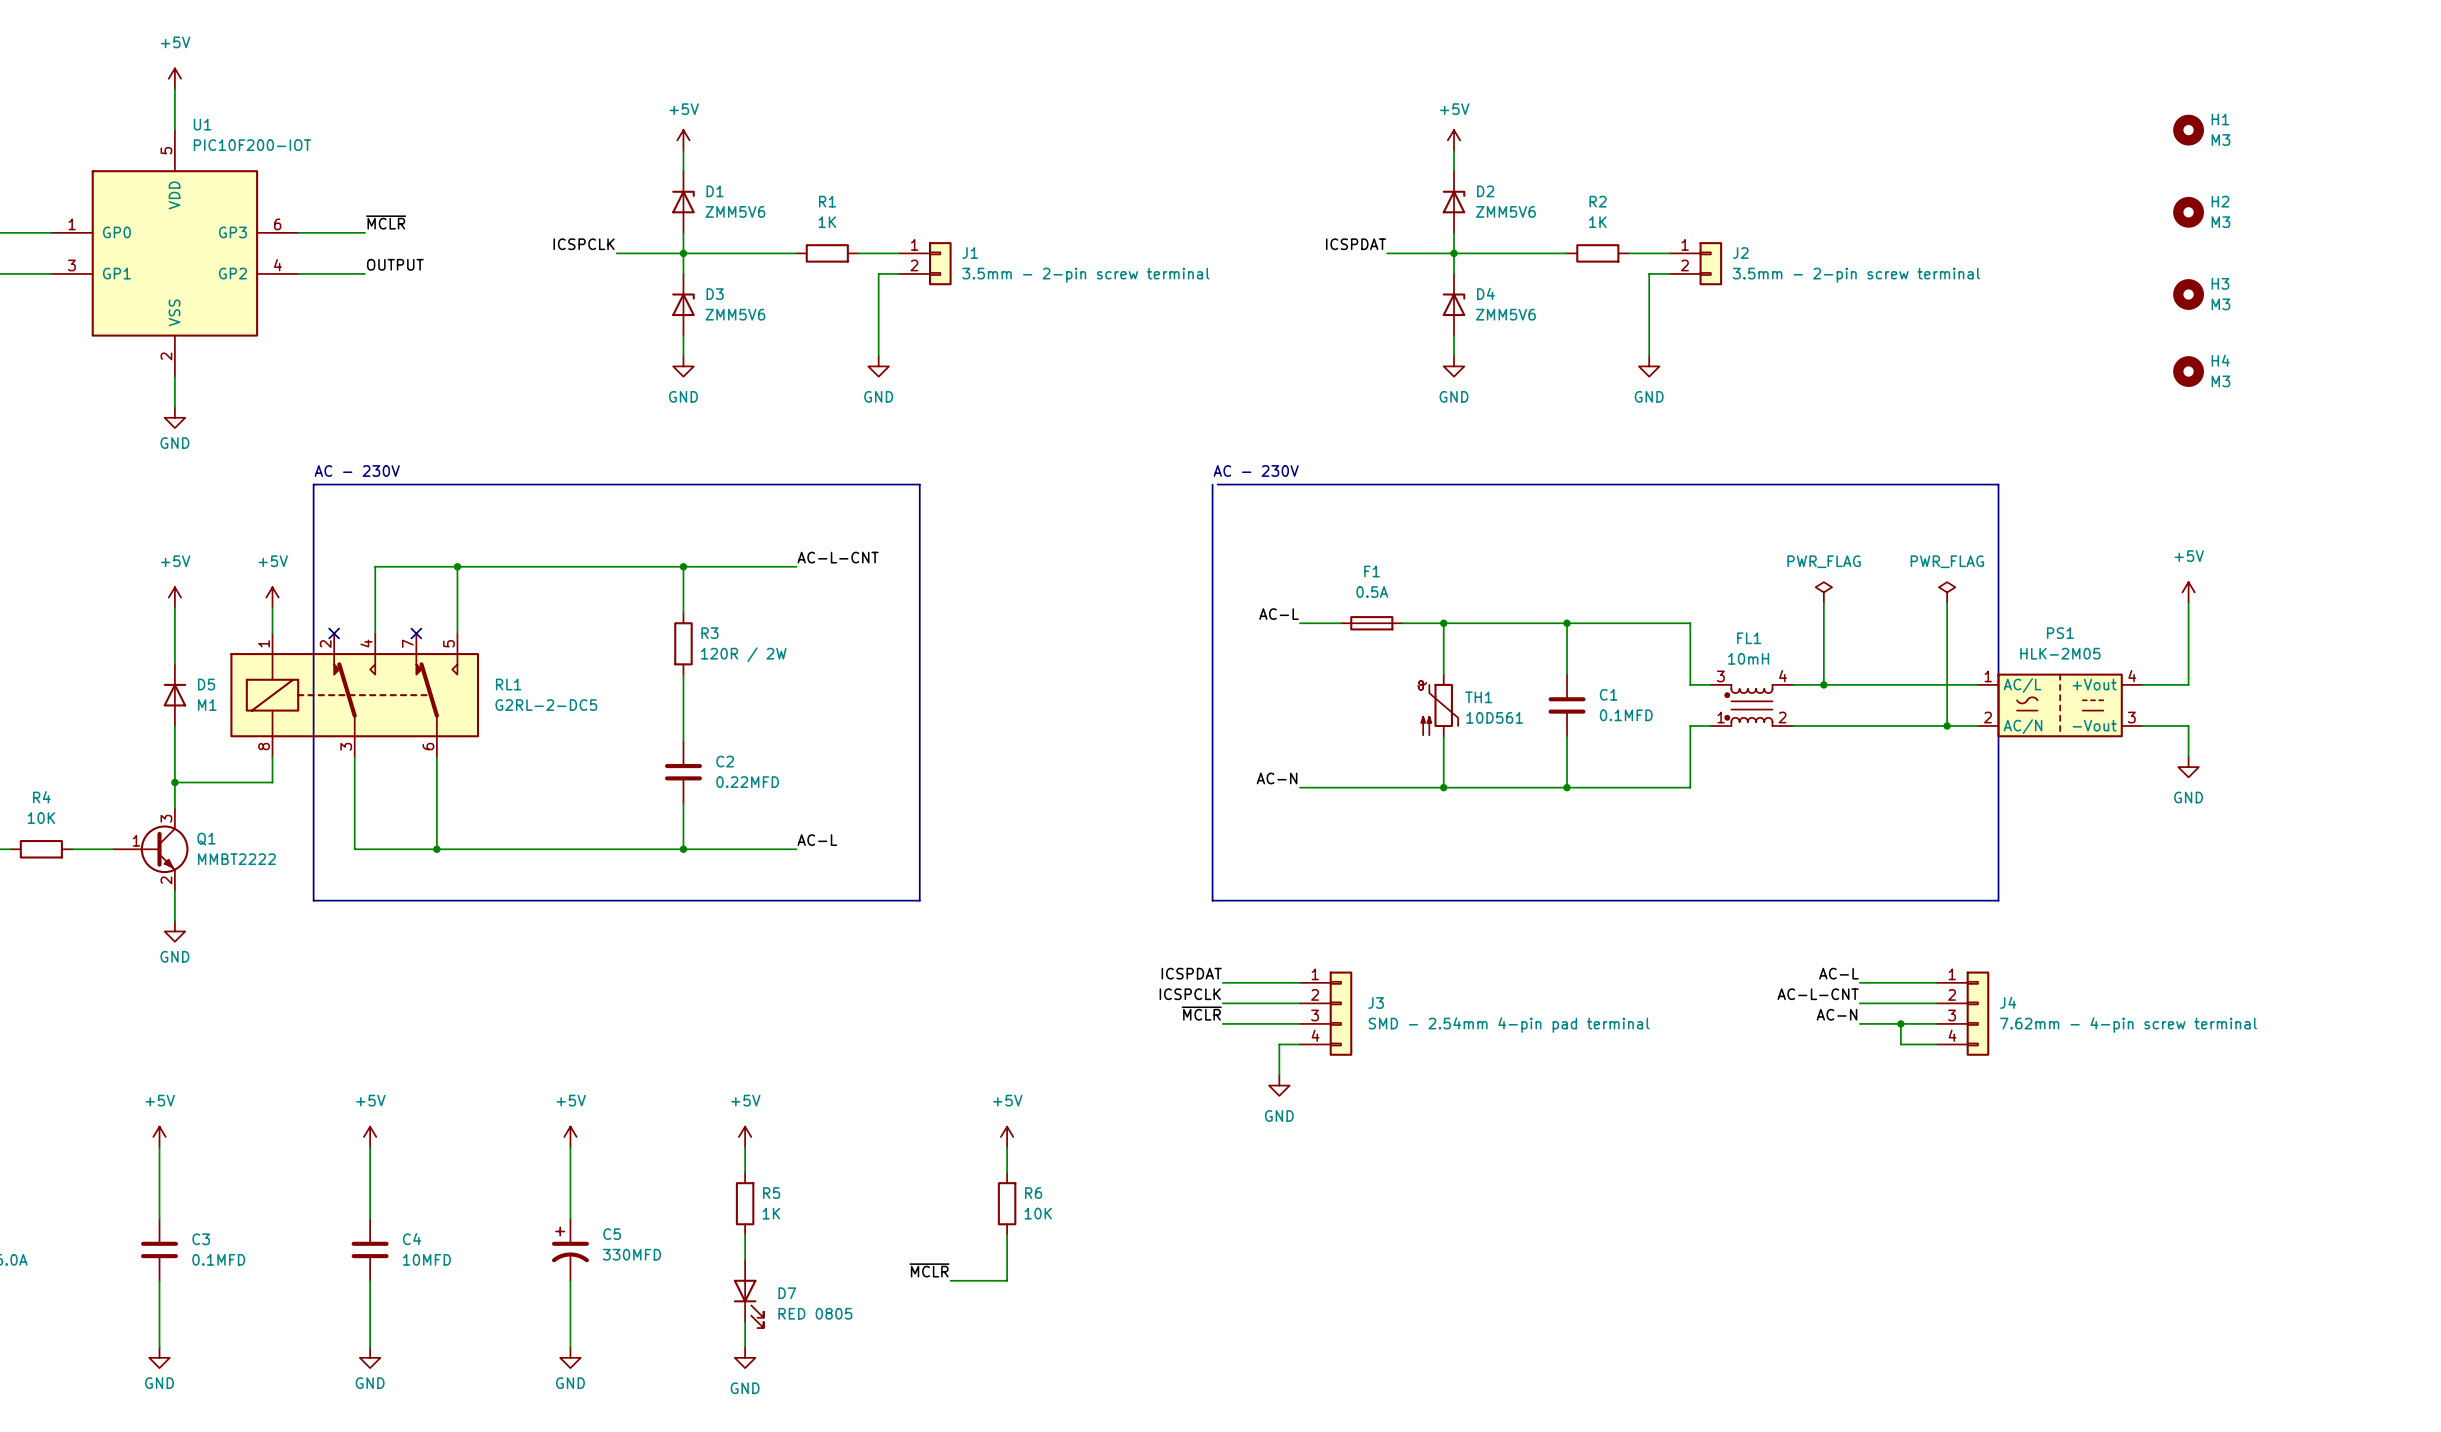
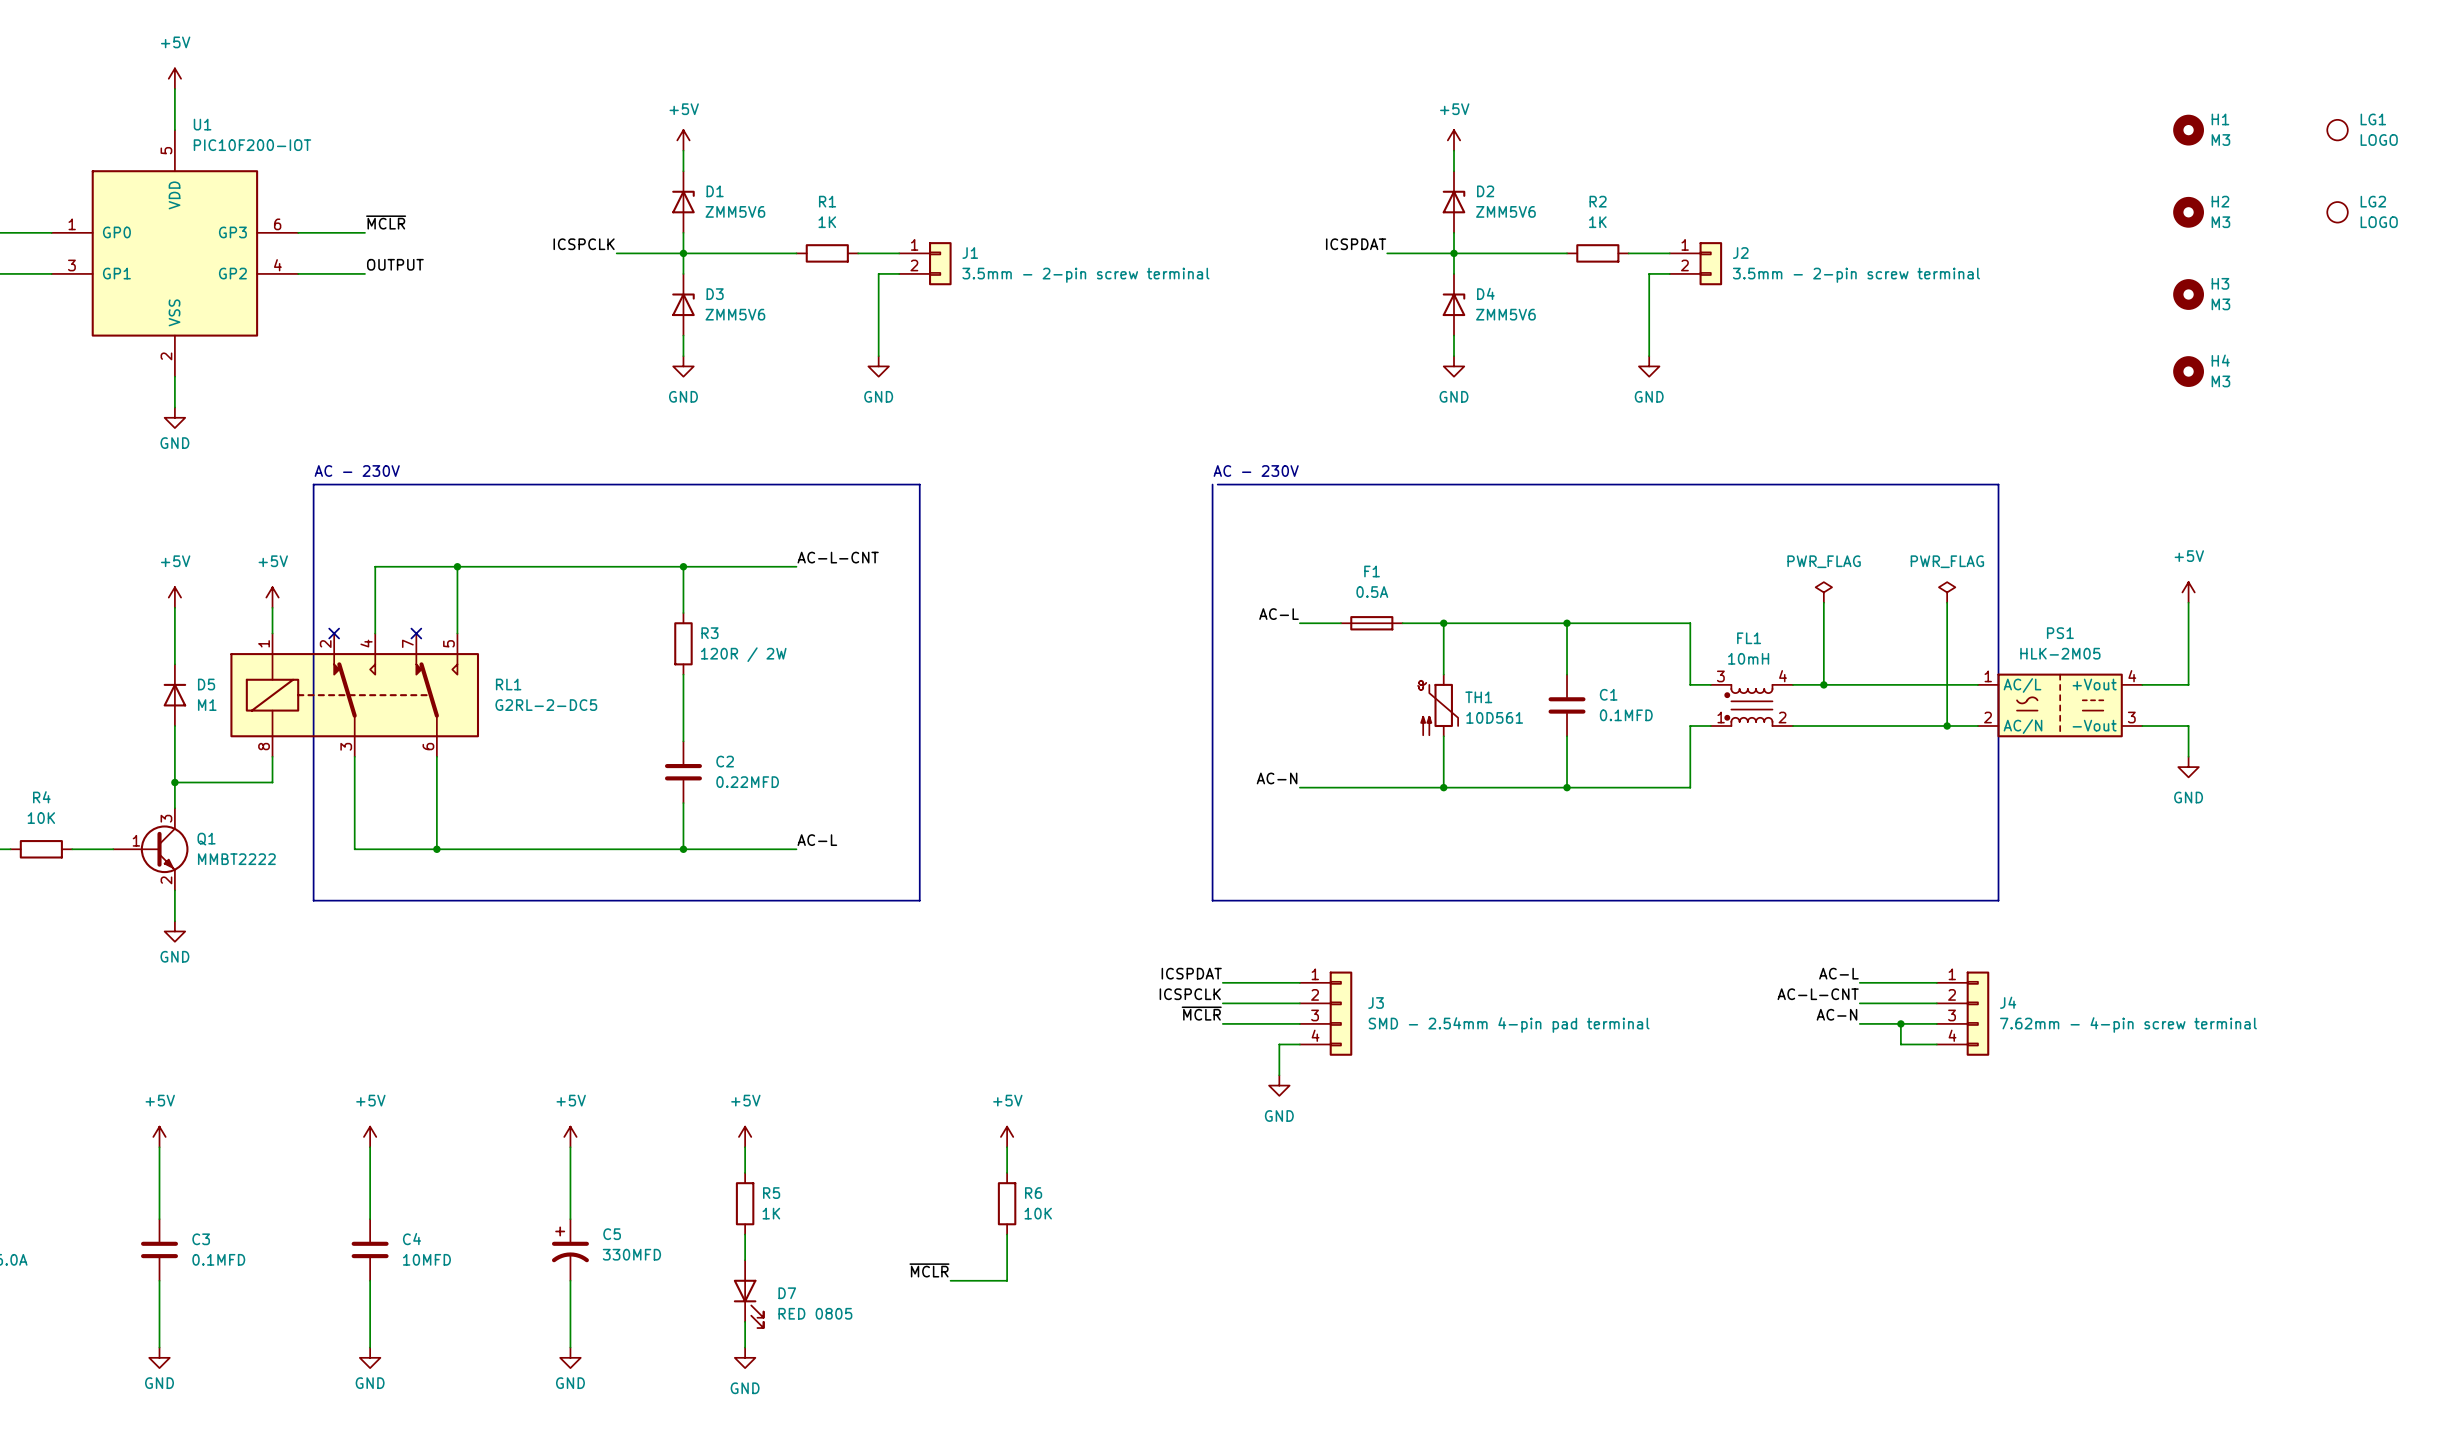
LG1: none -> LOGO (2337, 130)
LG2: none -> LOGO (2337, 212)

